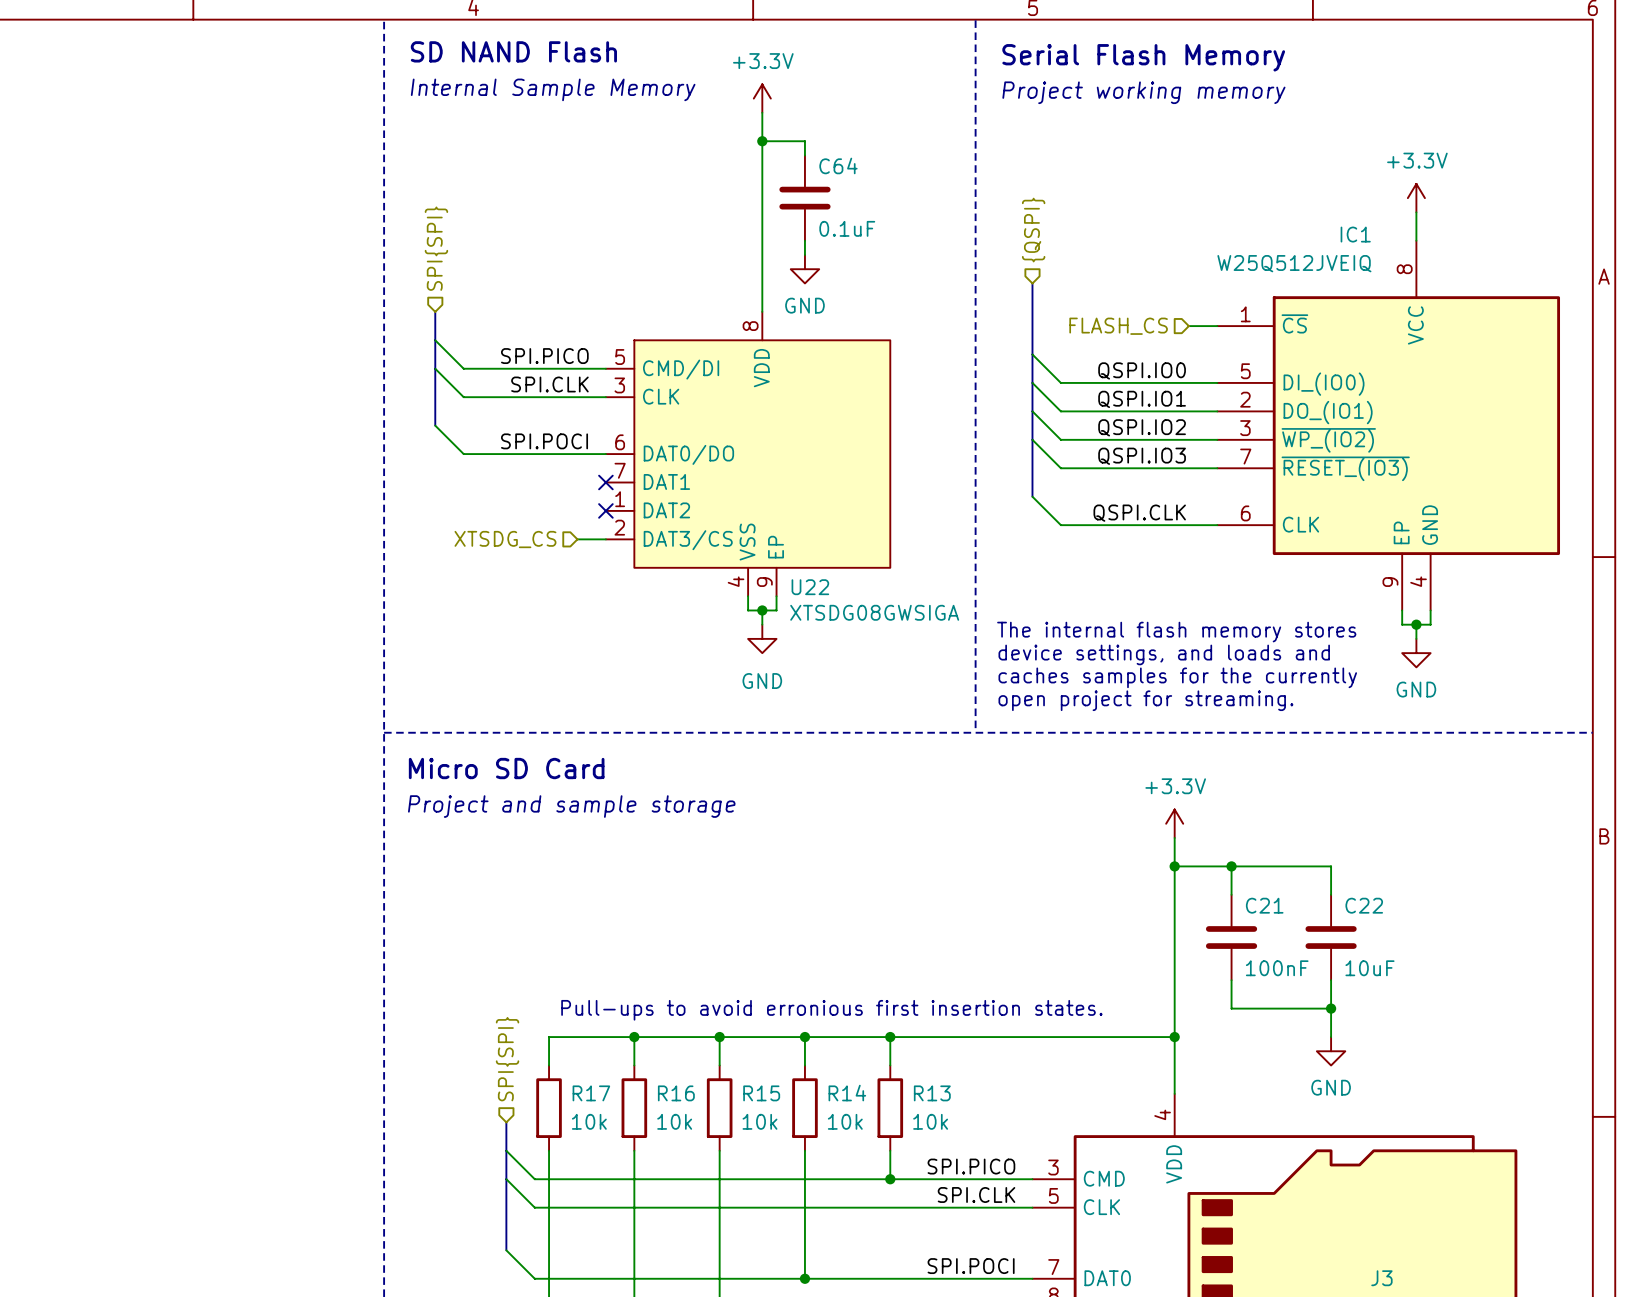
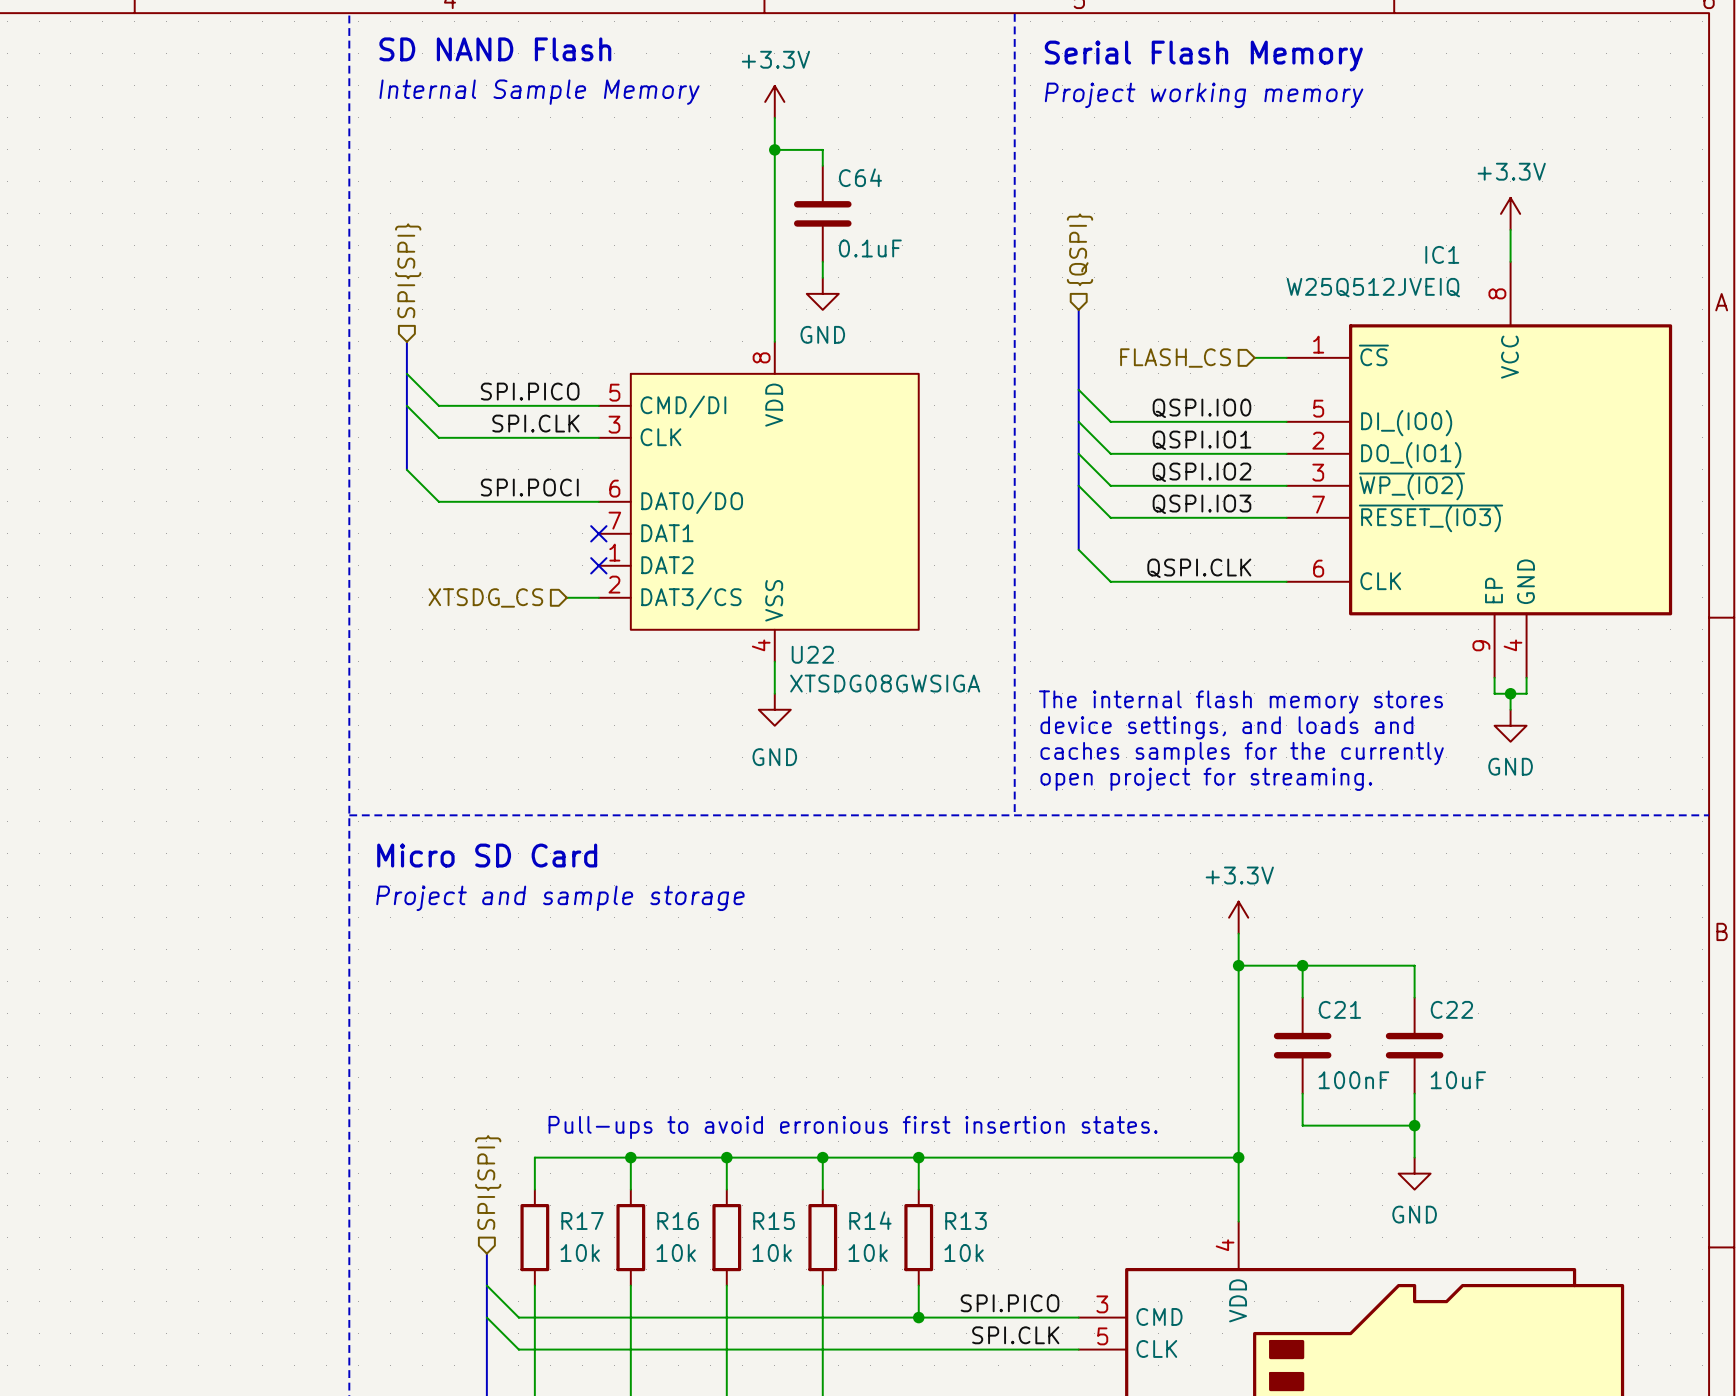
U22 symbol: [605, 311, 891, 597] -> [598, 341, 919, 662]
wire: (748, 596) (748, 610) (776, 610) (776, 596) -> none
wire: none -> (774, 661) (774, 677)
junction: (762, 610) -> none

